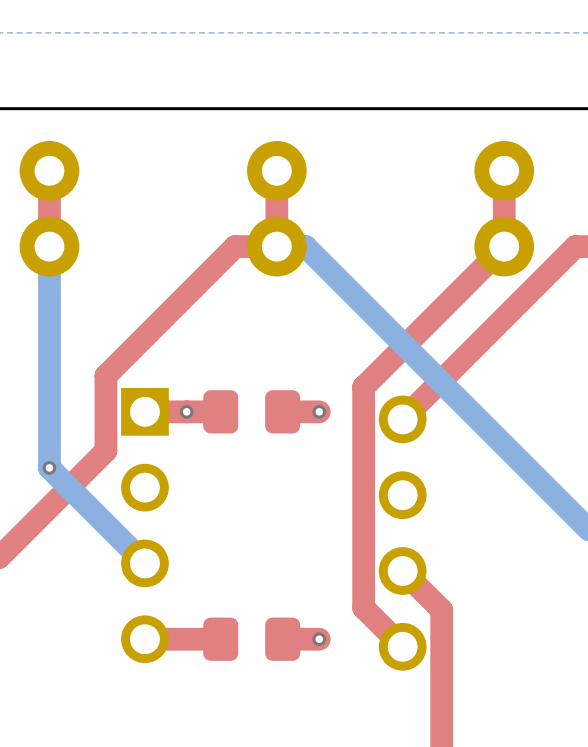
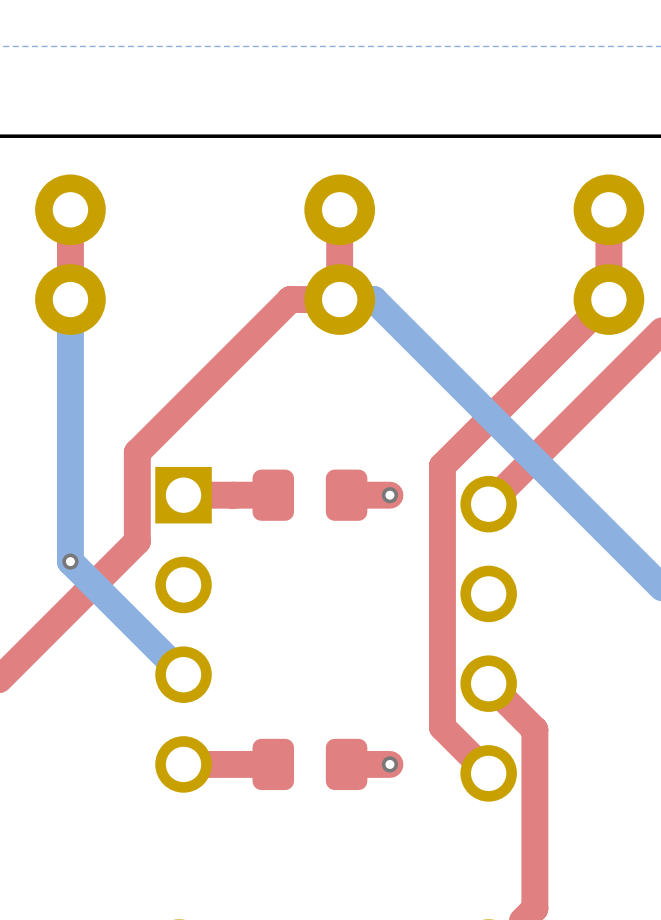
via: (186, 411) -> none

